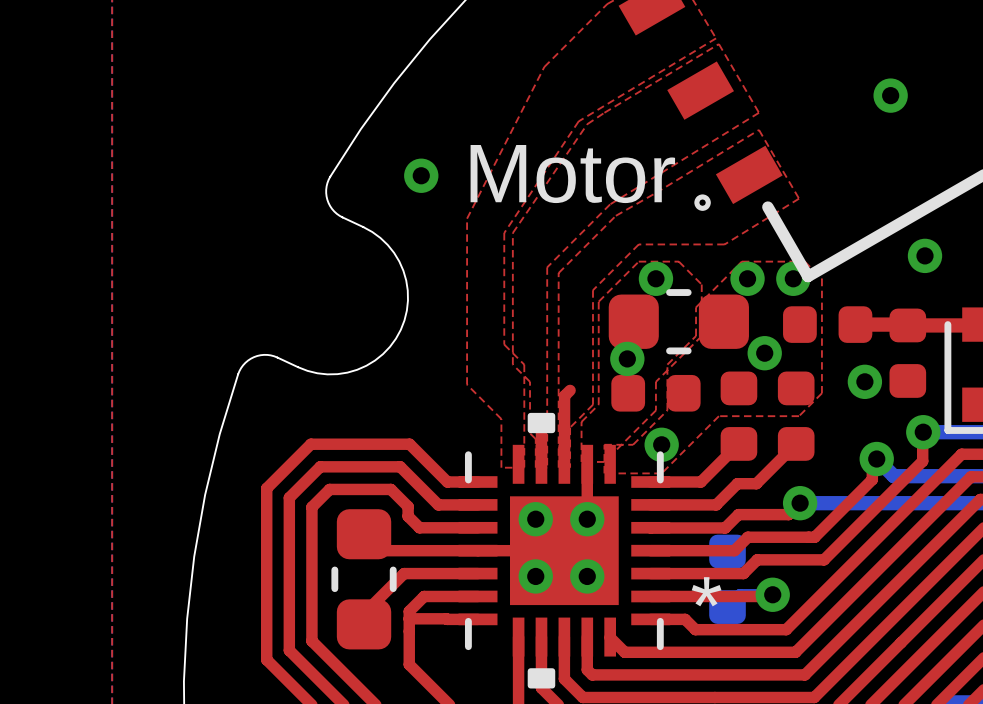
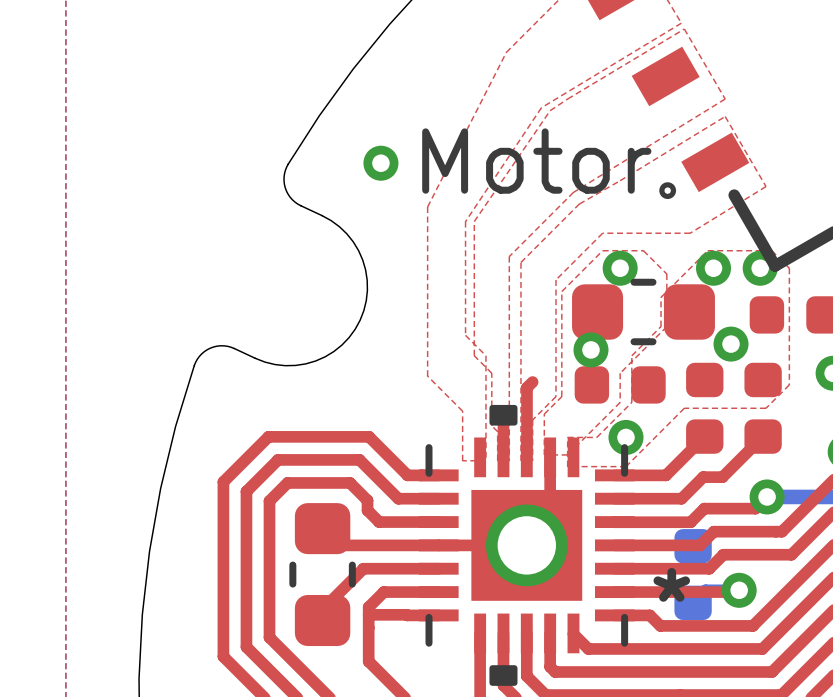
via: (535, 519) -> none
via: (587, 519) -> none
via: none -> (526, 545)
via: (535, 576) -> none
via: (587, 576) -> none

